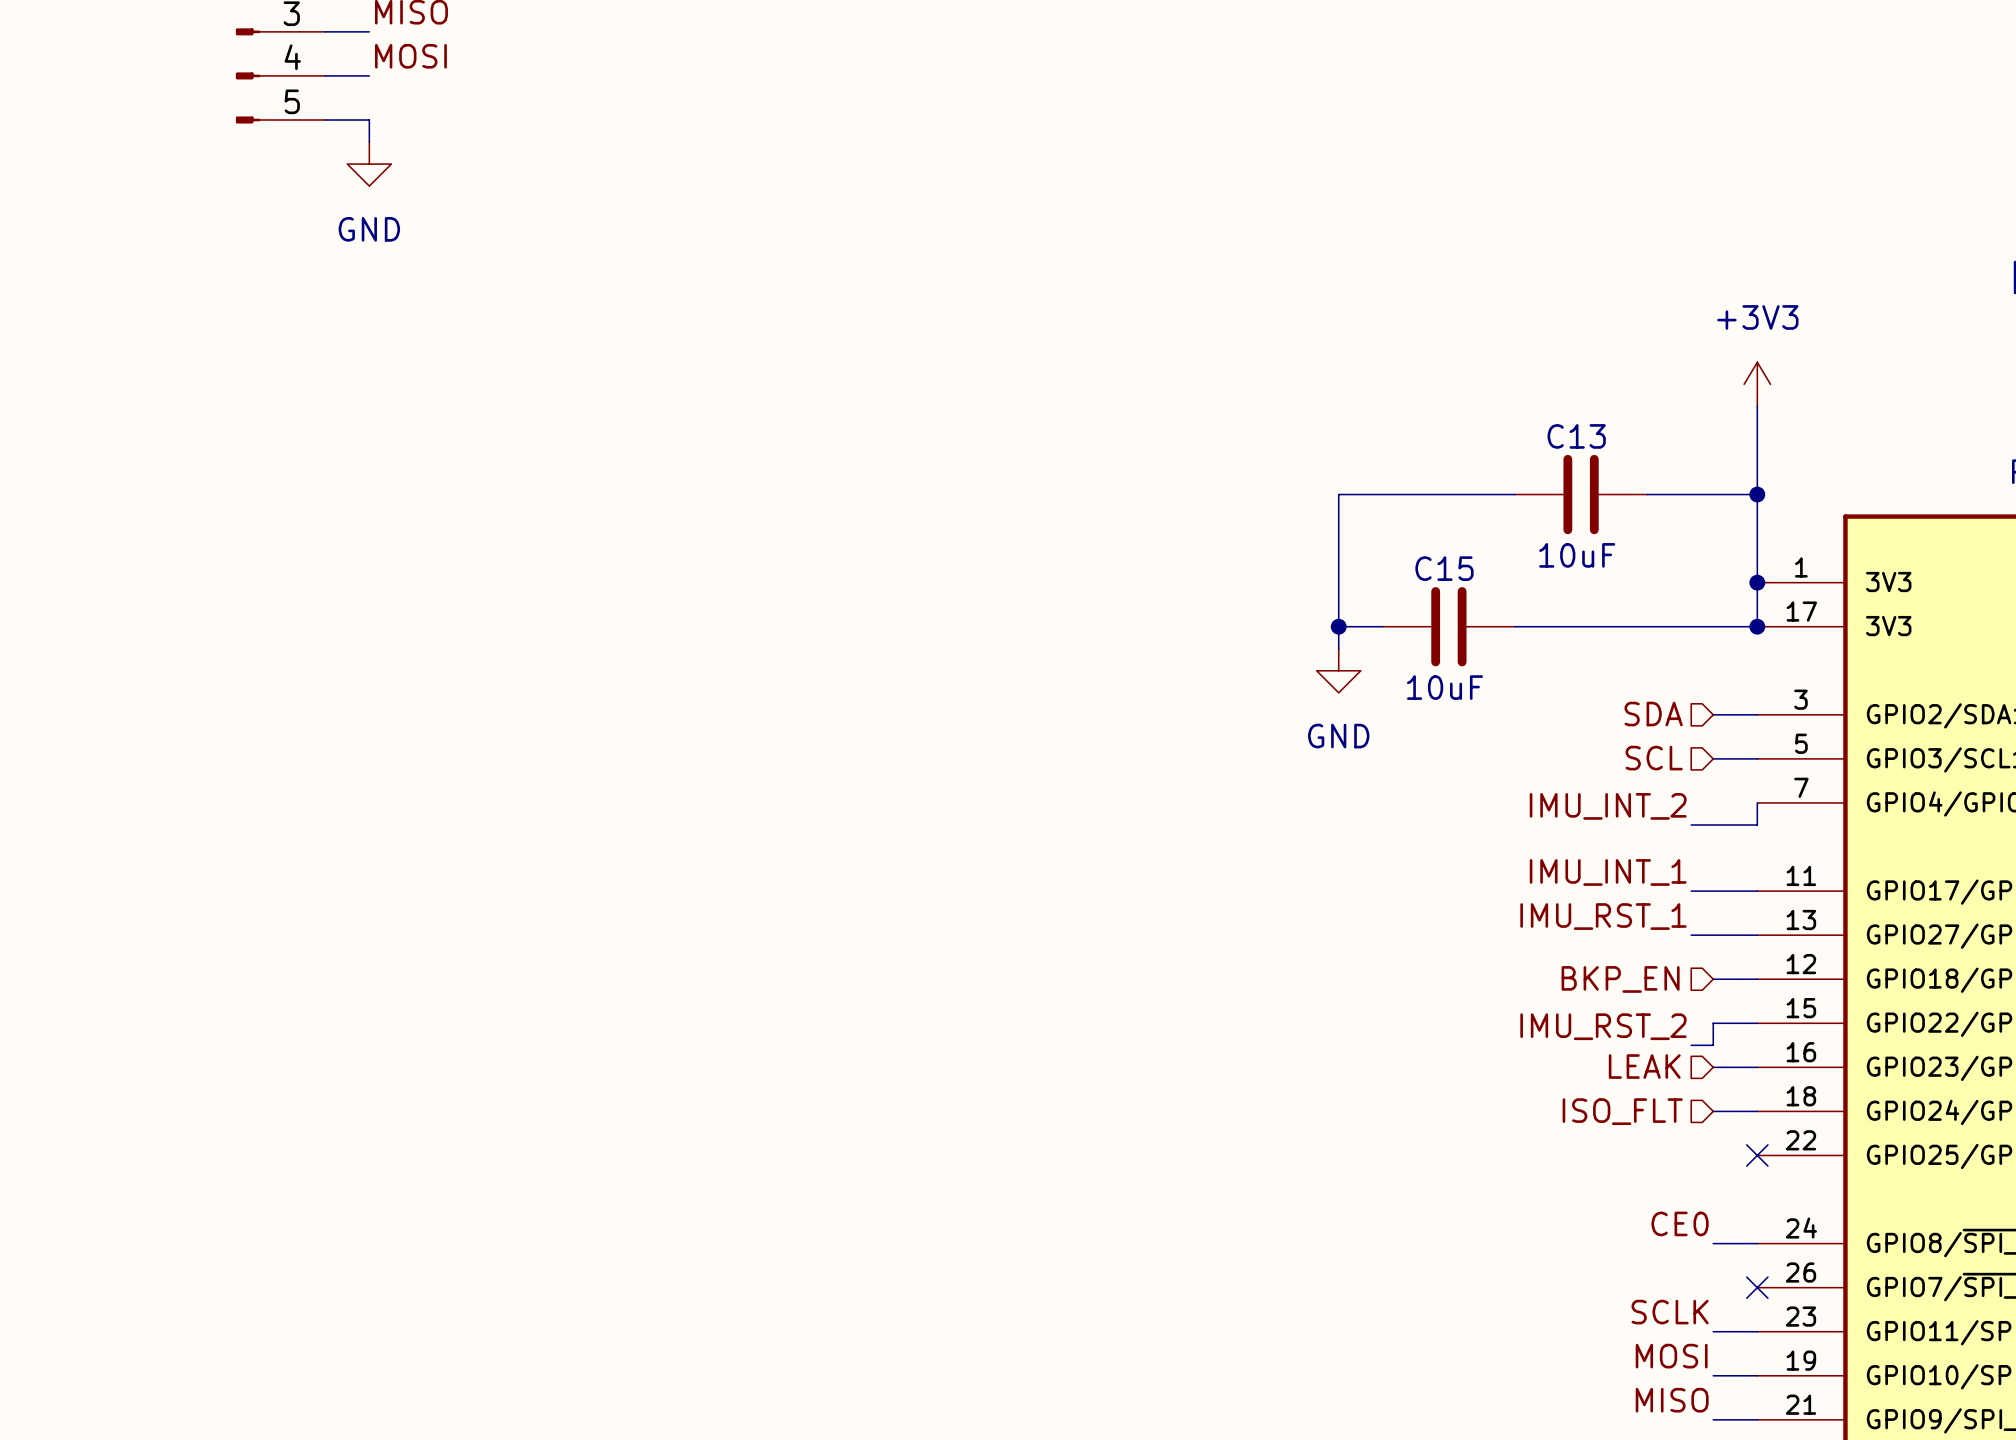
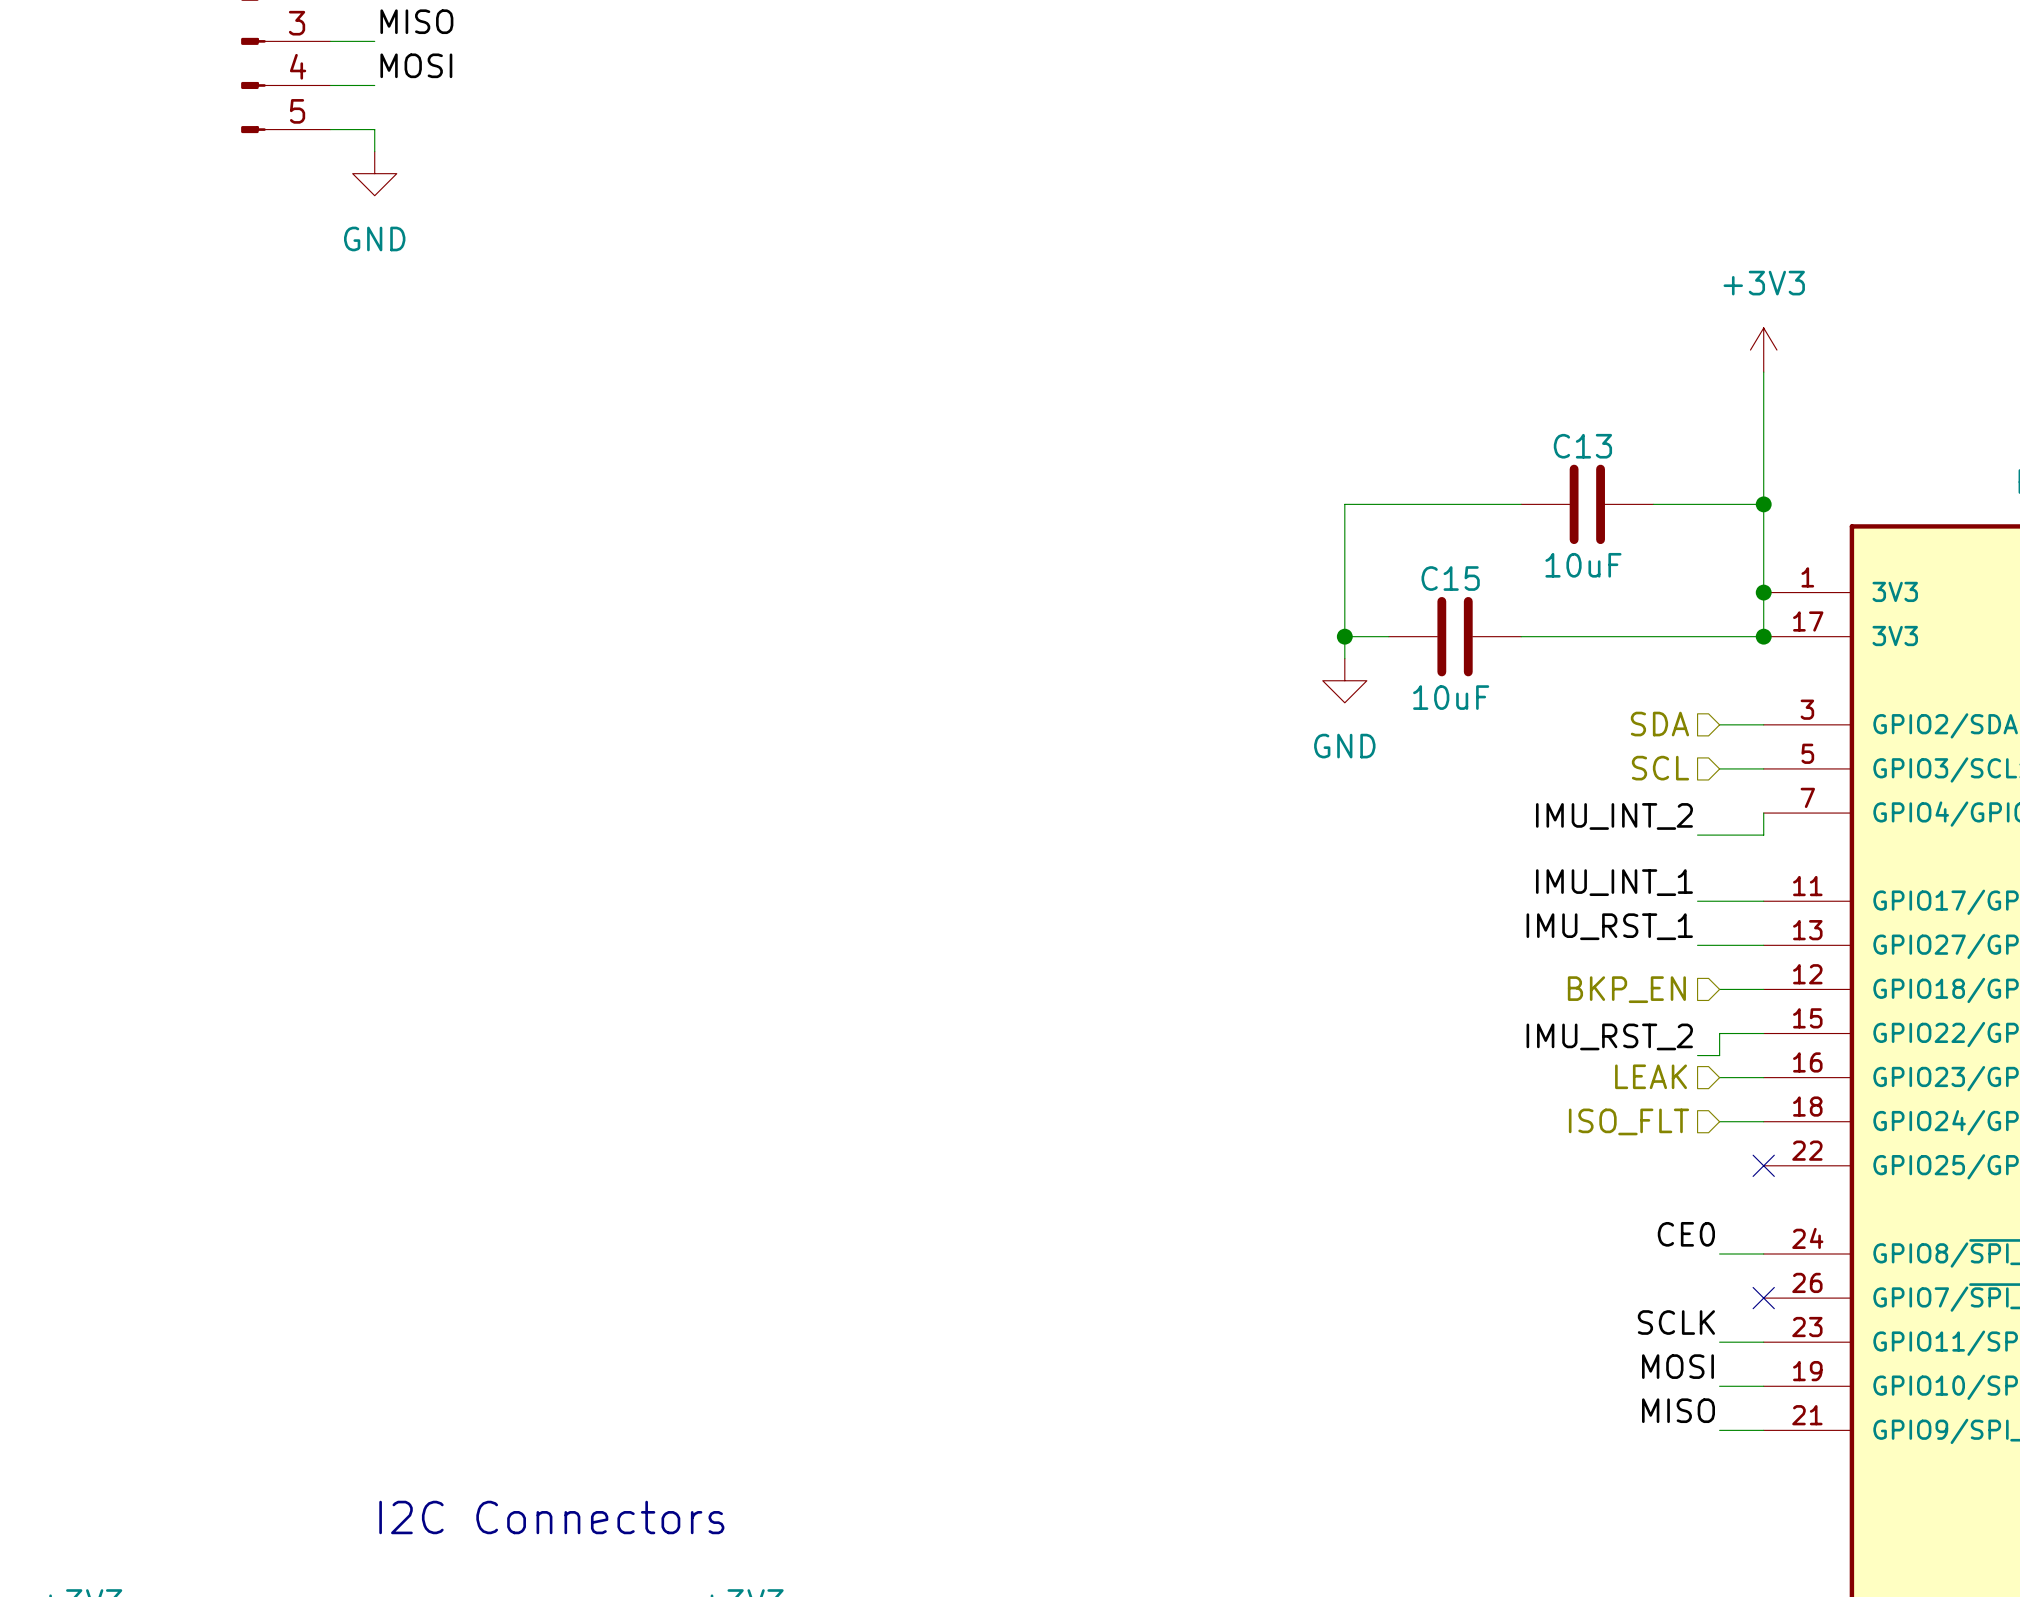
power symbol position: +3V3 (1757, 384) -> +3V3 (1763, 350)

